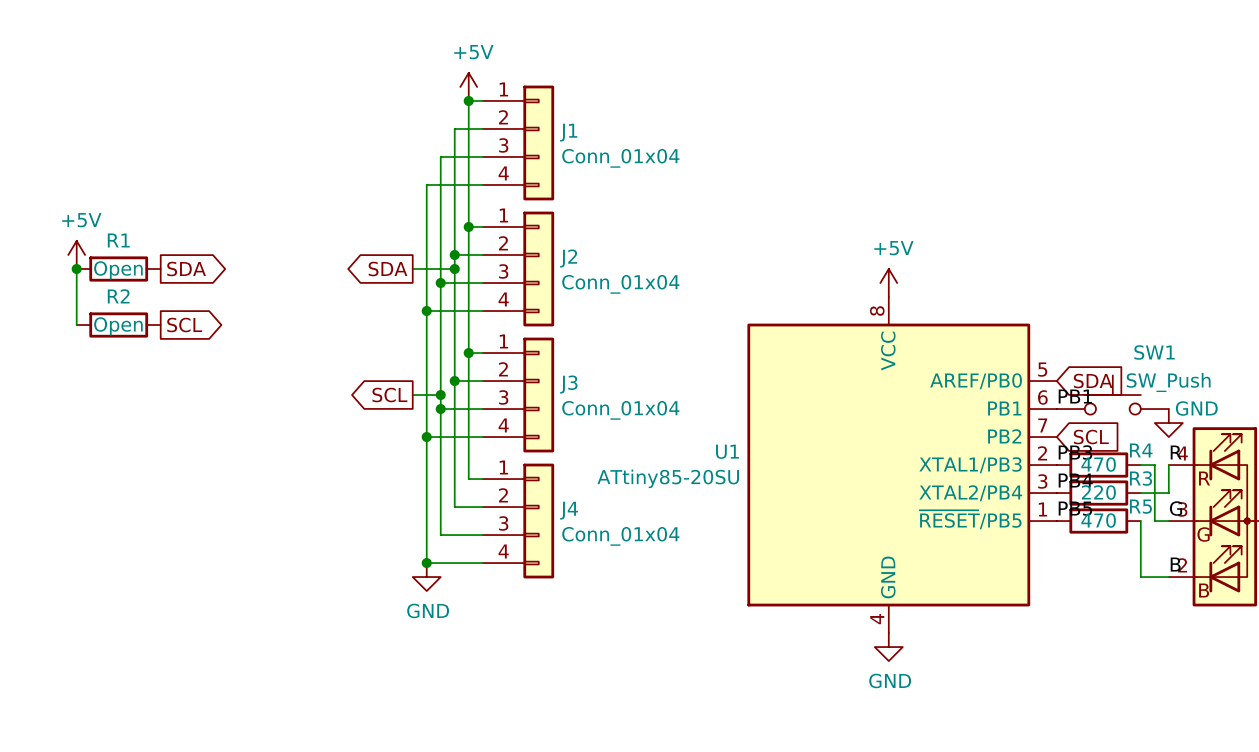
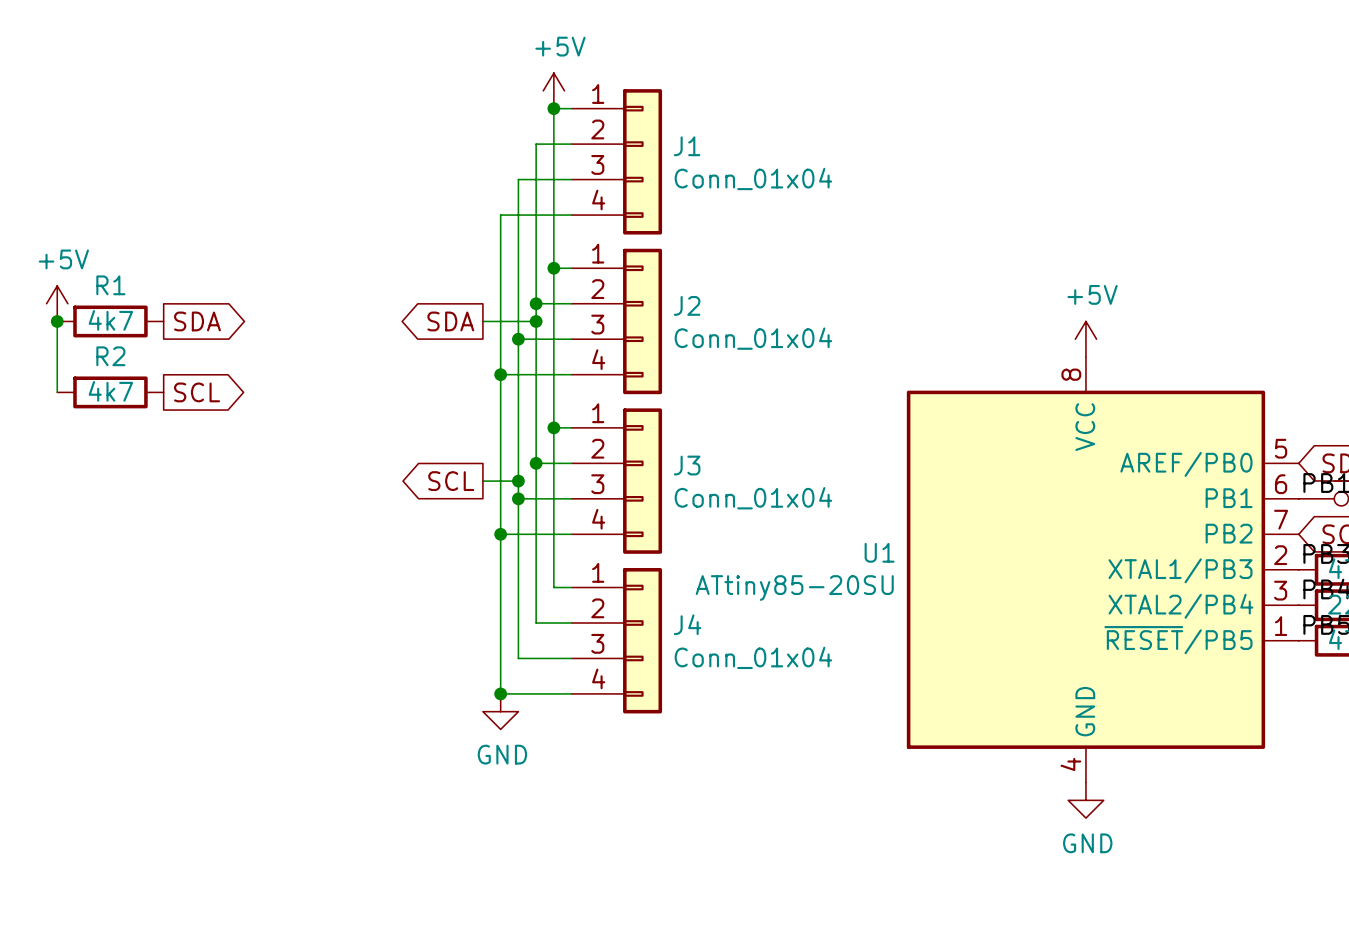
R1 value: Open (118, 270) -> 4k7 (110, 320)
R2 value: Open (118, 326) -> 4k7 (110, 391)

